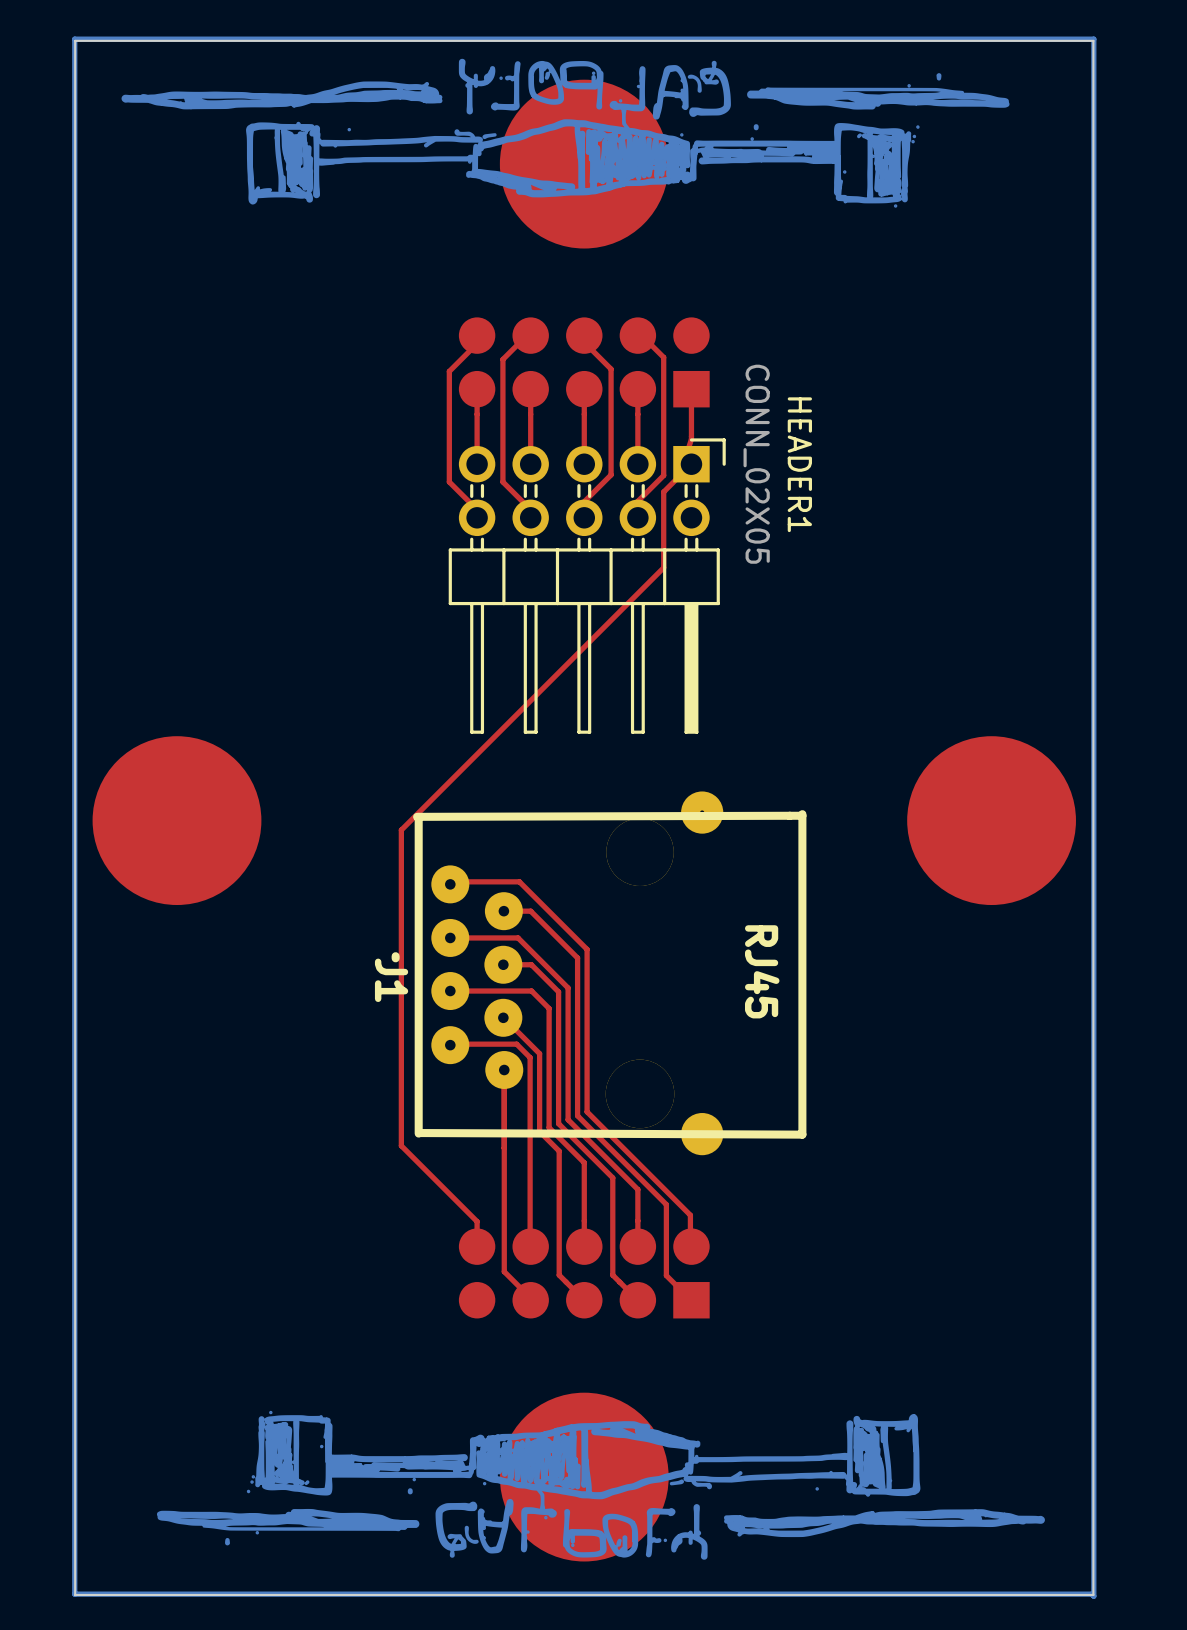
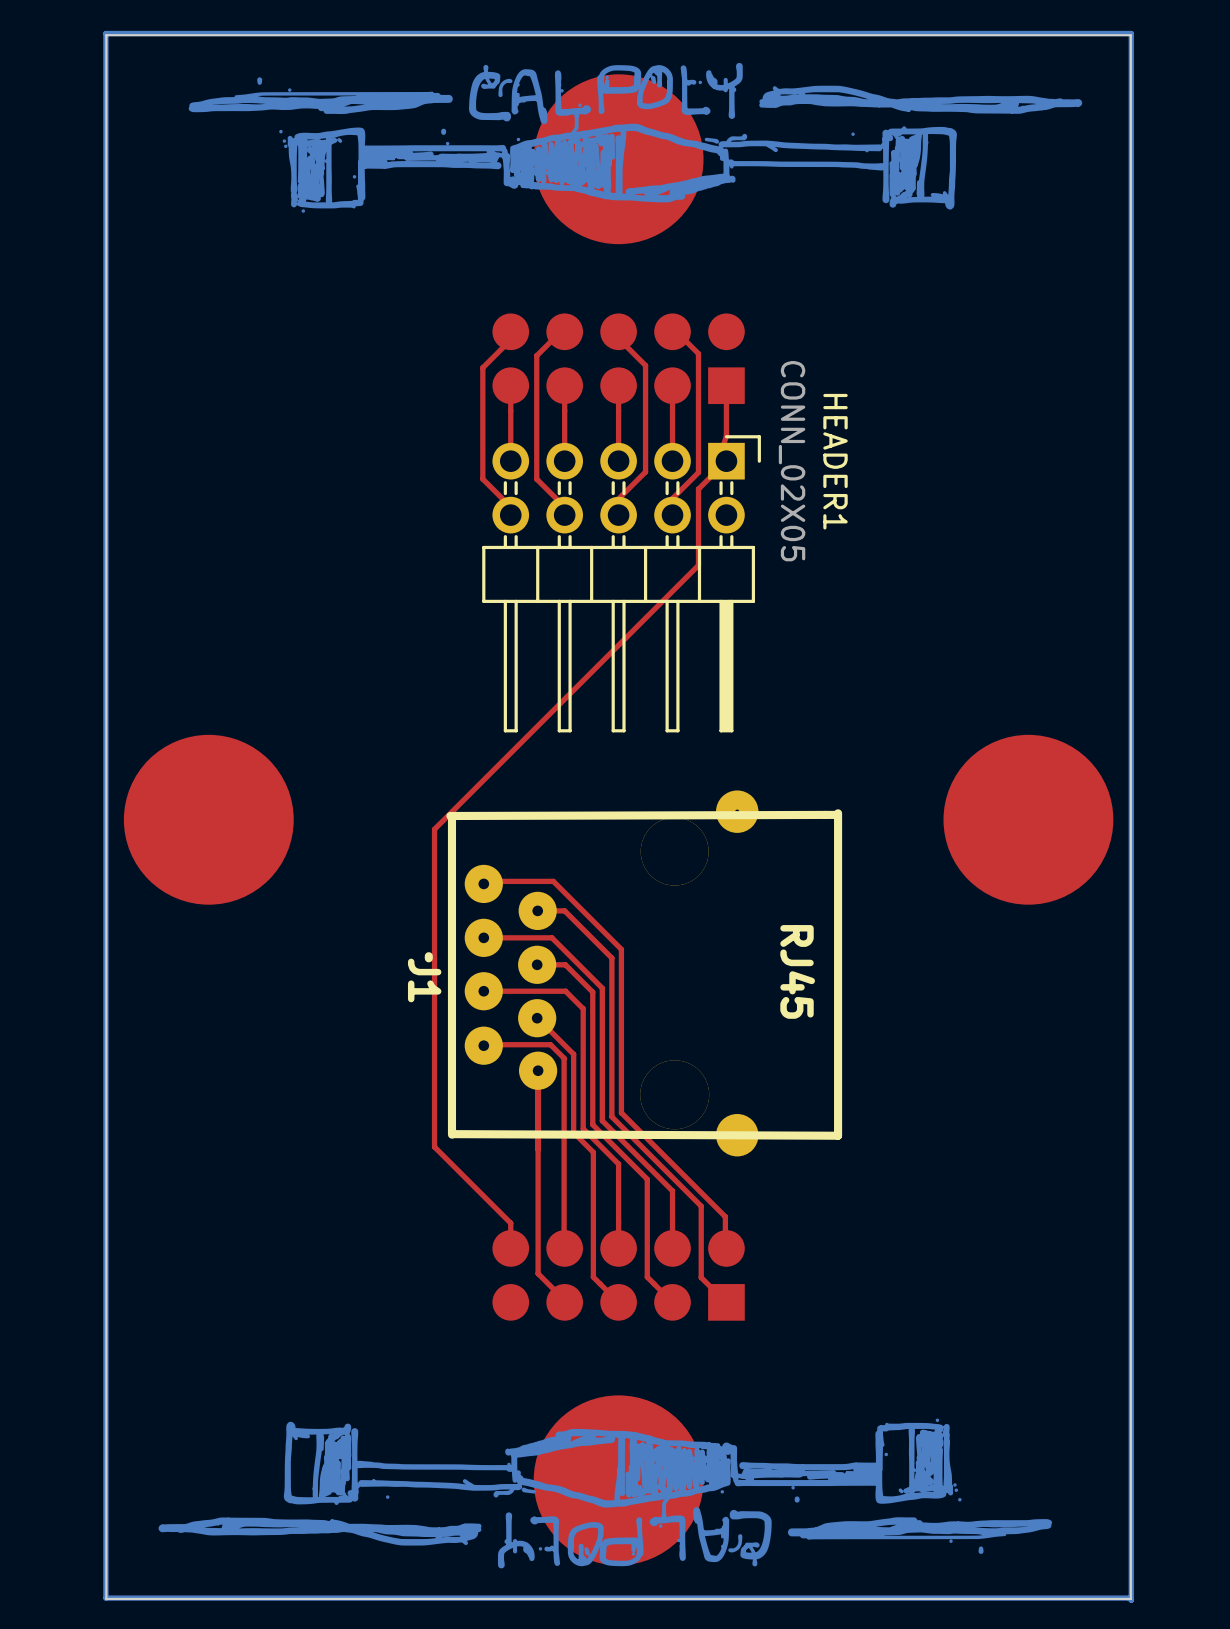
drawing: [121, 58, 1010, 208] -> none
drawing: none -> [188, 62, 1083, 213]
drawing: [156, 1410, 1045, 1560] -> none
drawing: none -> [158, 1418, 1052, 1569]

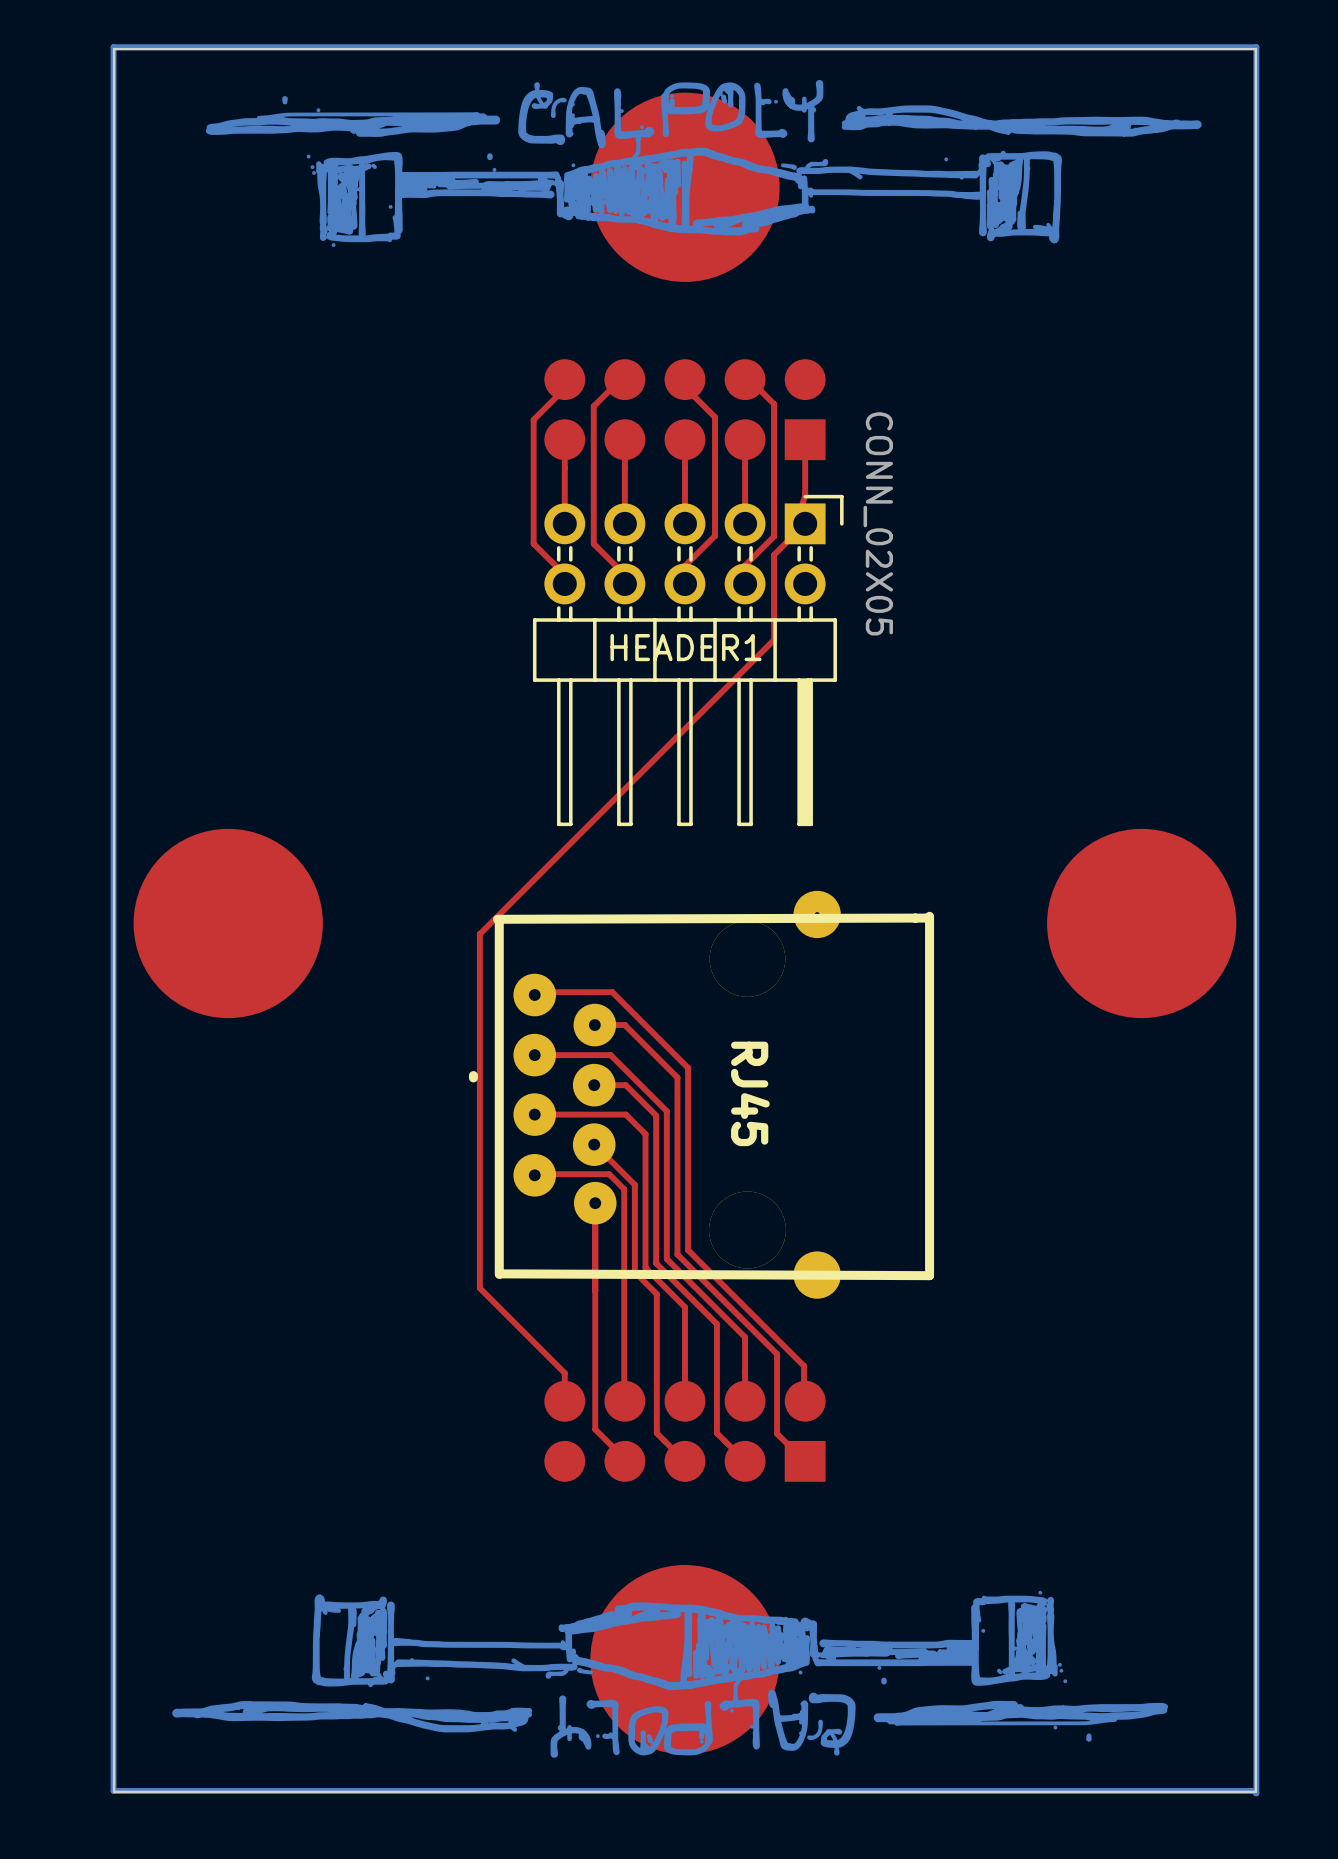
HEADER1 name rotation: 0° (835, 461) -> 90° counterclockwise (686, 647)
HEADER1 name position: HEADER1 (835, 461) -> HEADER1 (686, 647)
J1 value position: RJ45 (797, 971) -> RJ45 (750, 1093)
J1 name: J1 (424, 980) -> none

